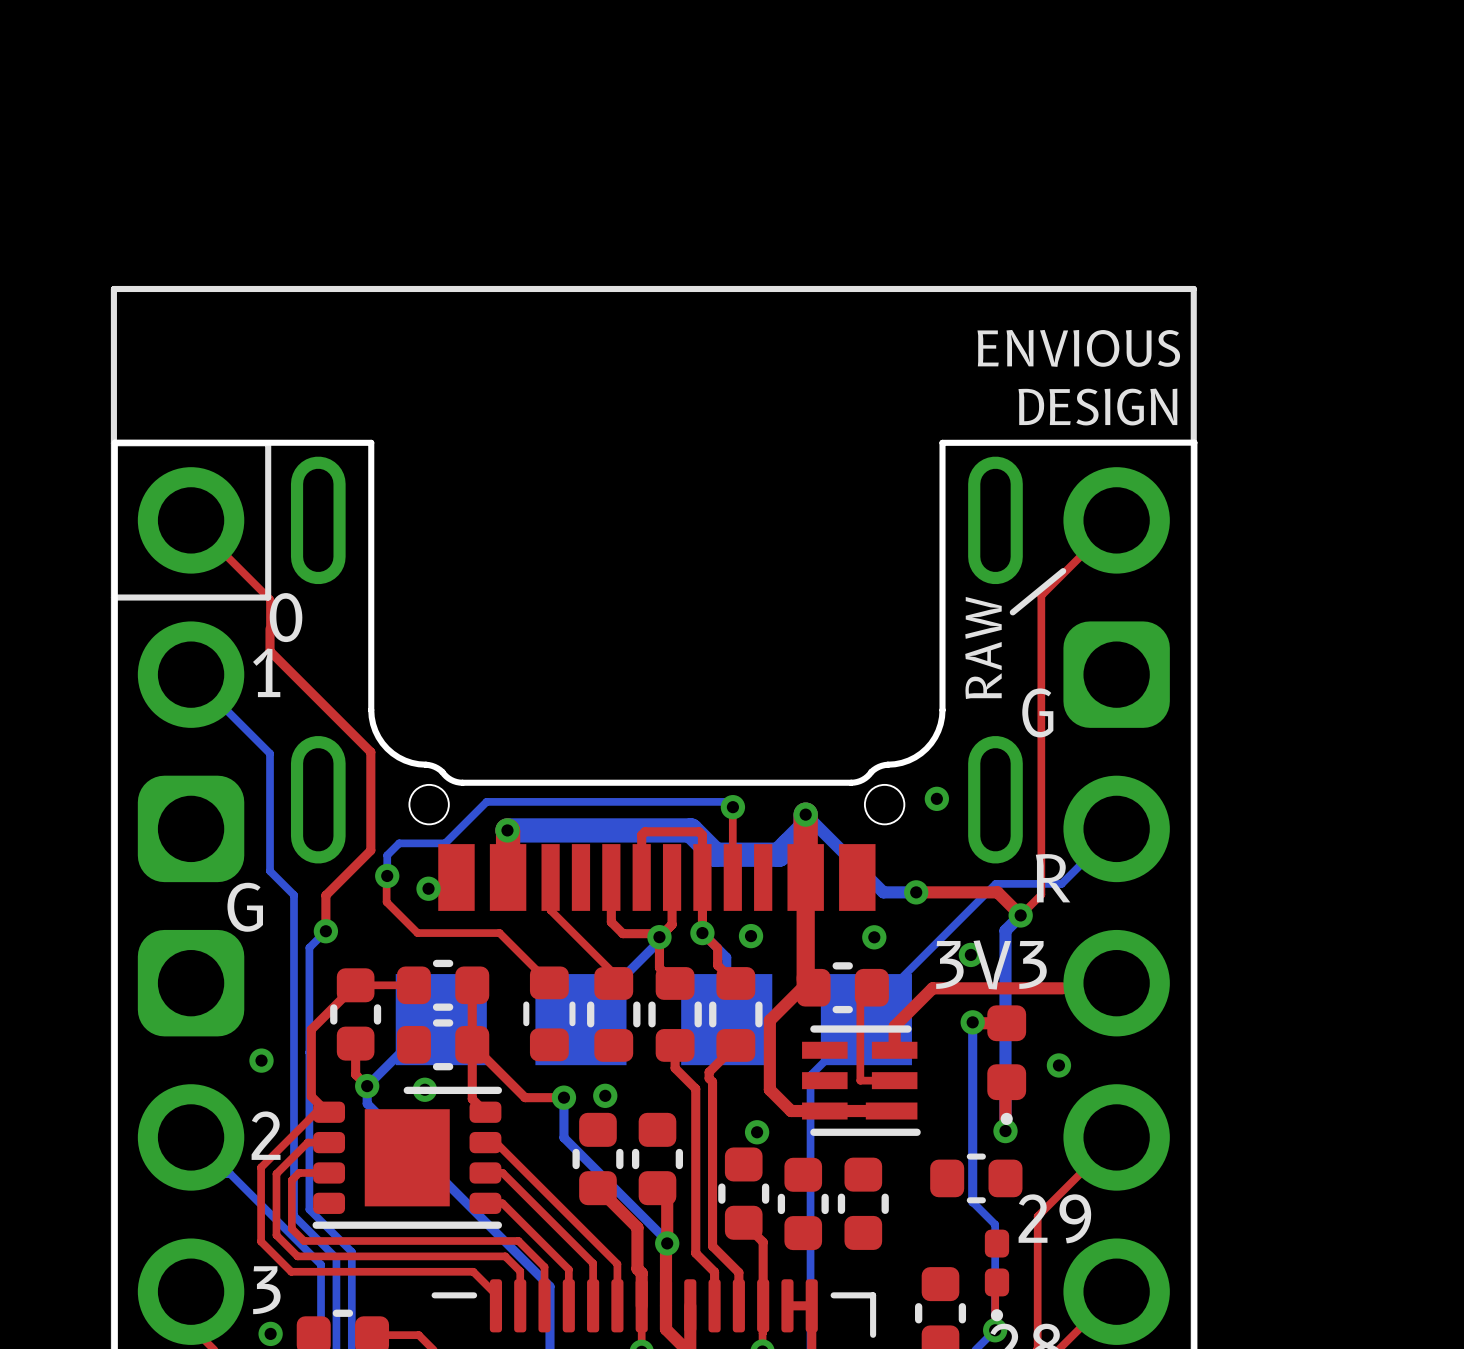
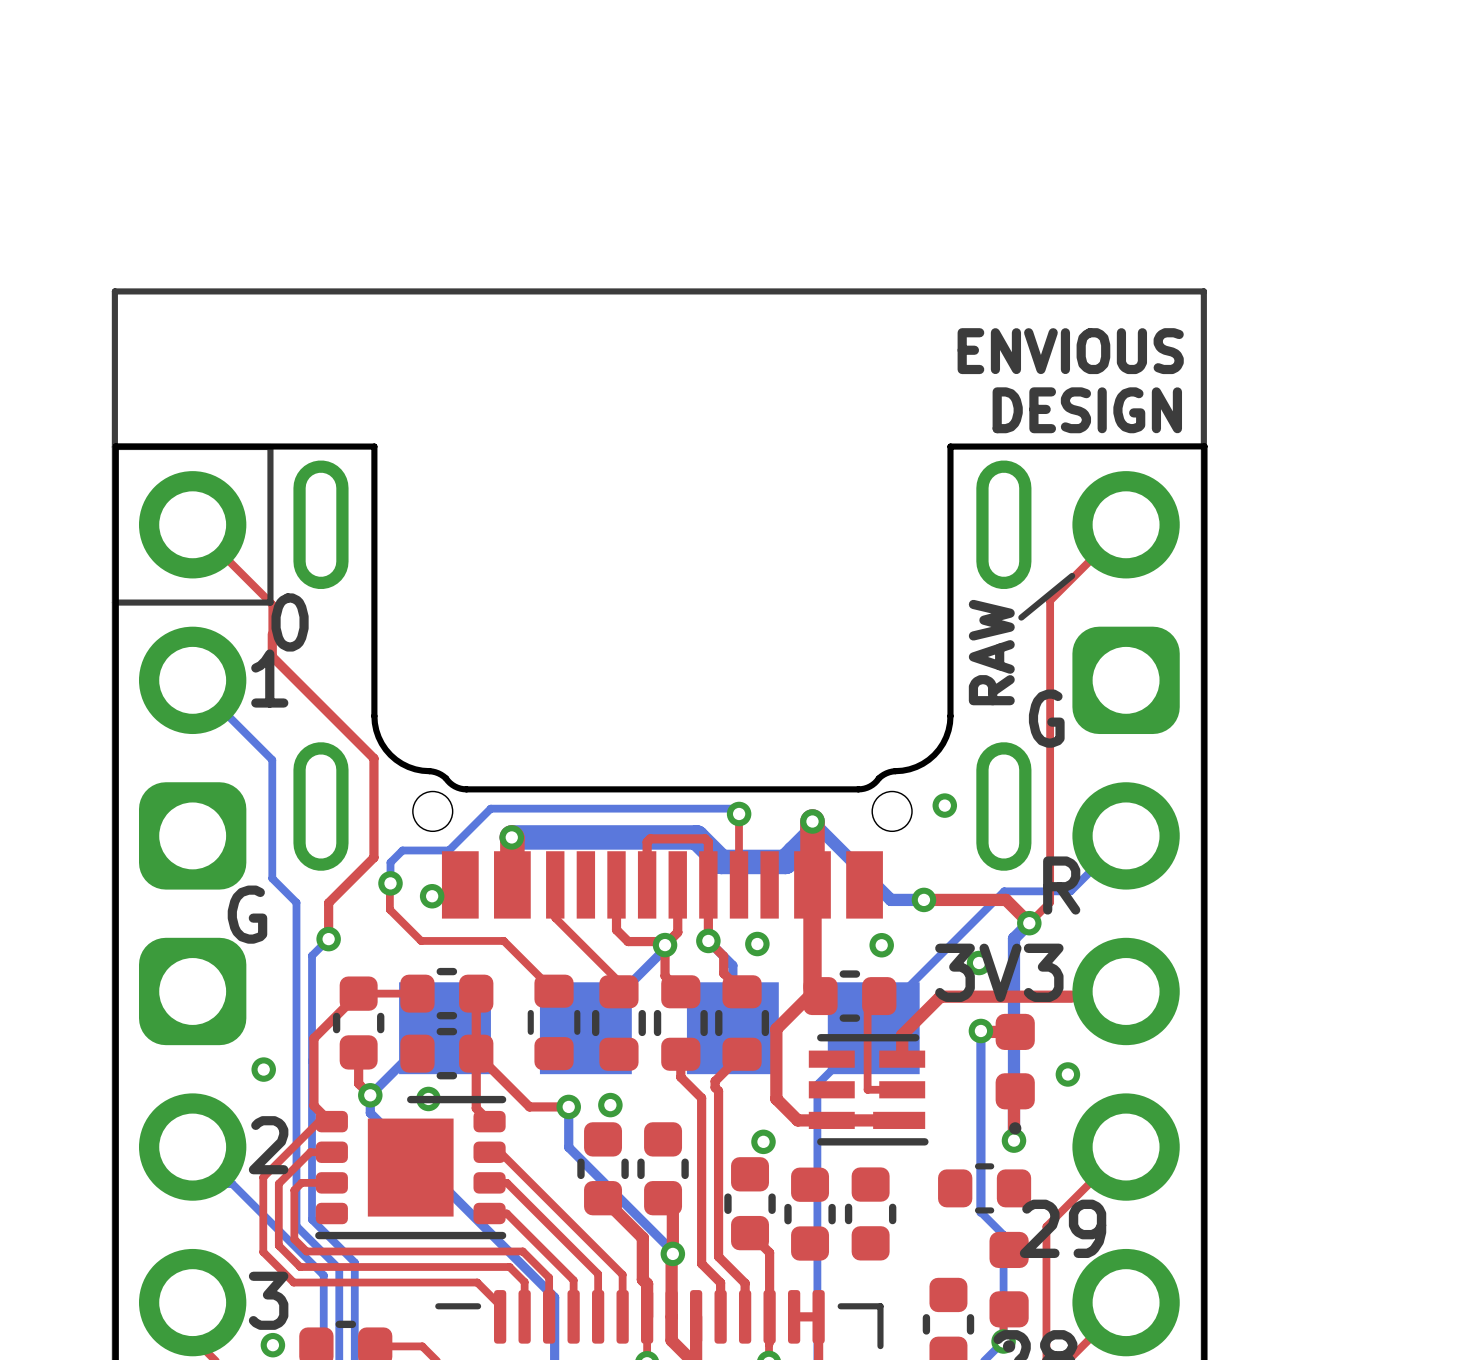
part footprint: [984, 1229, 1010, 1322] -> [989, 1231, 1029, 1353]

